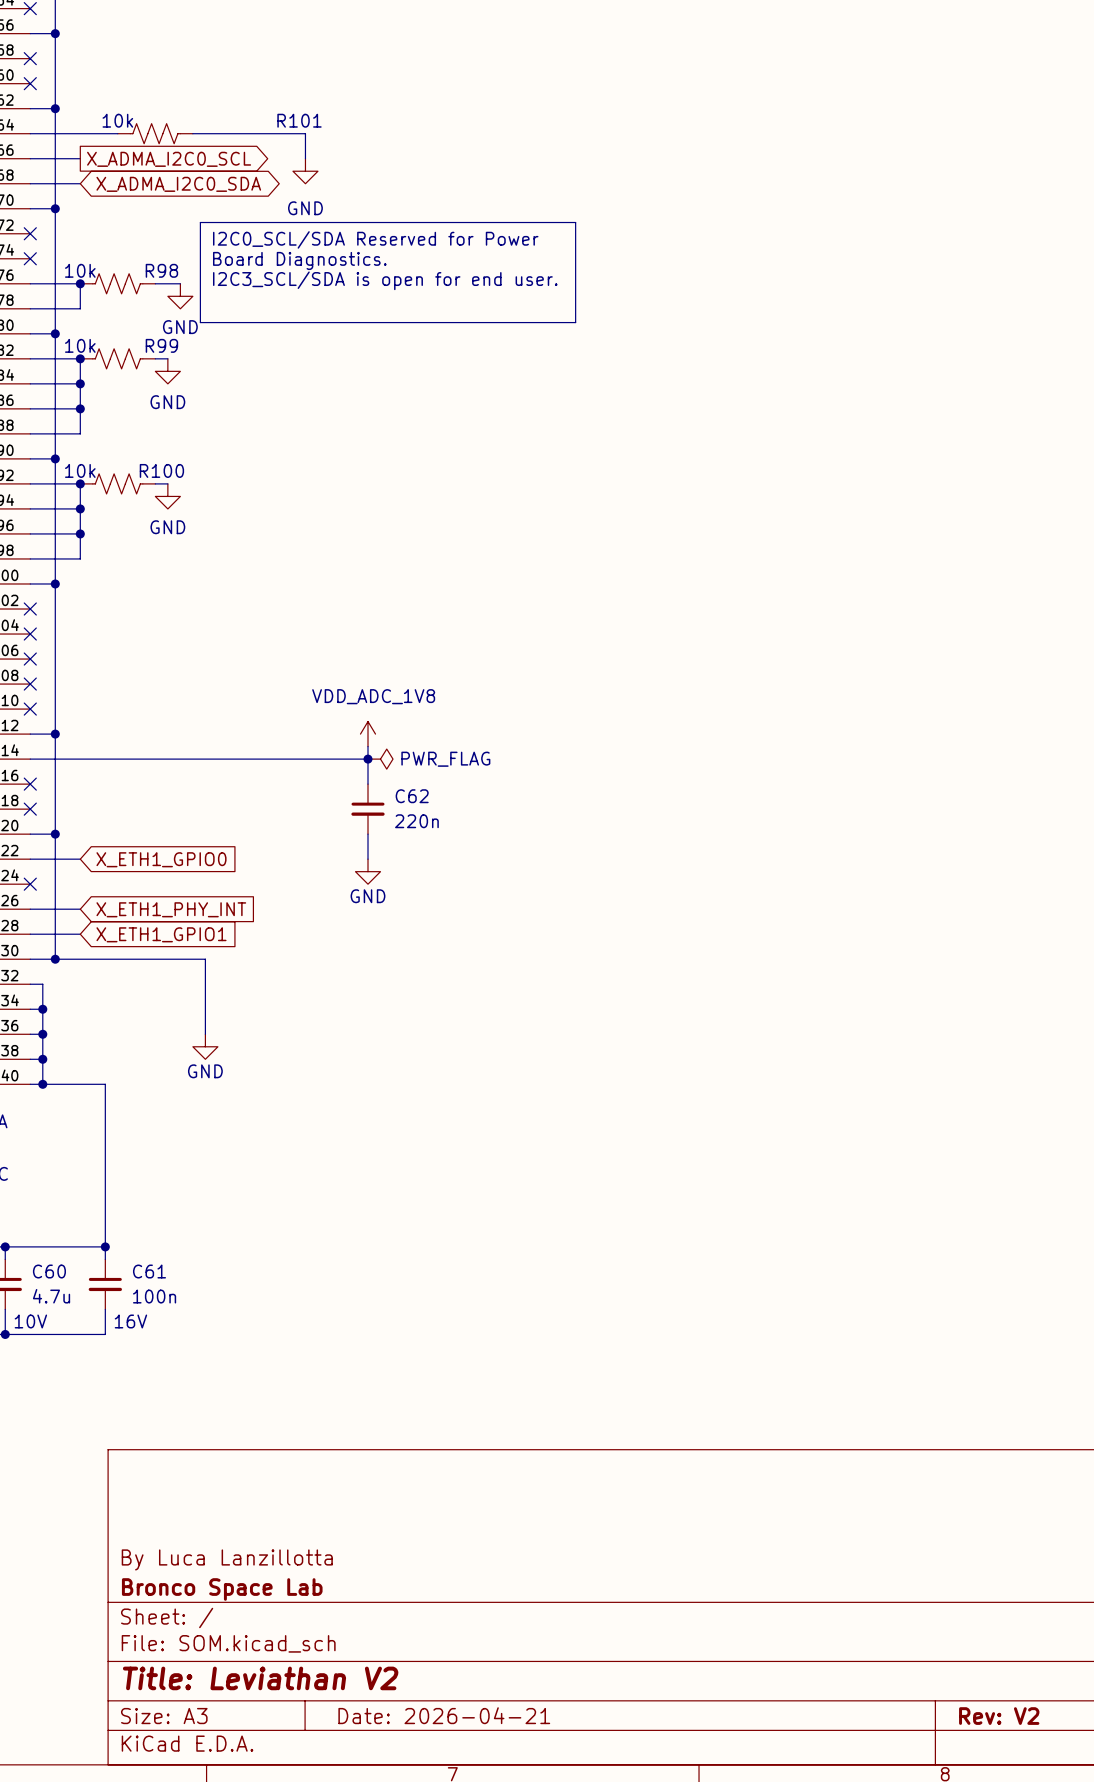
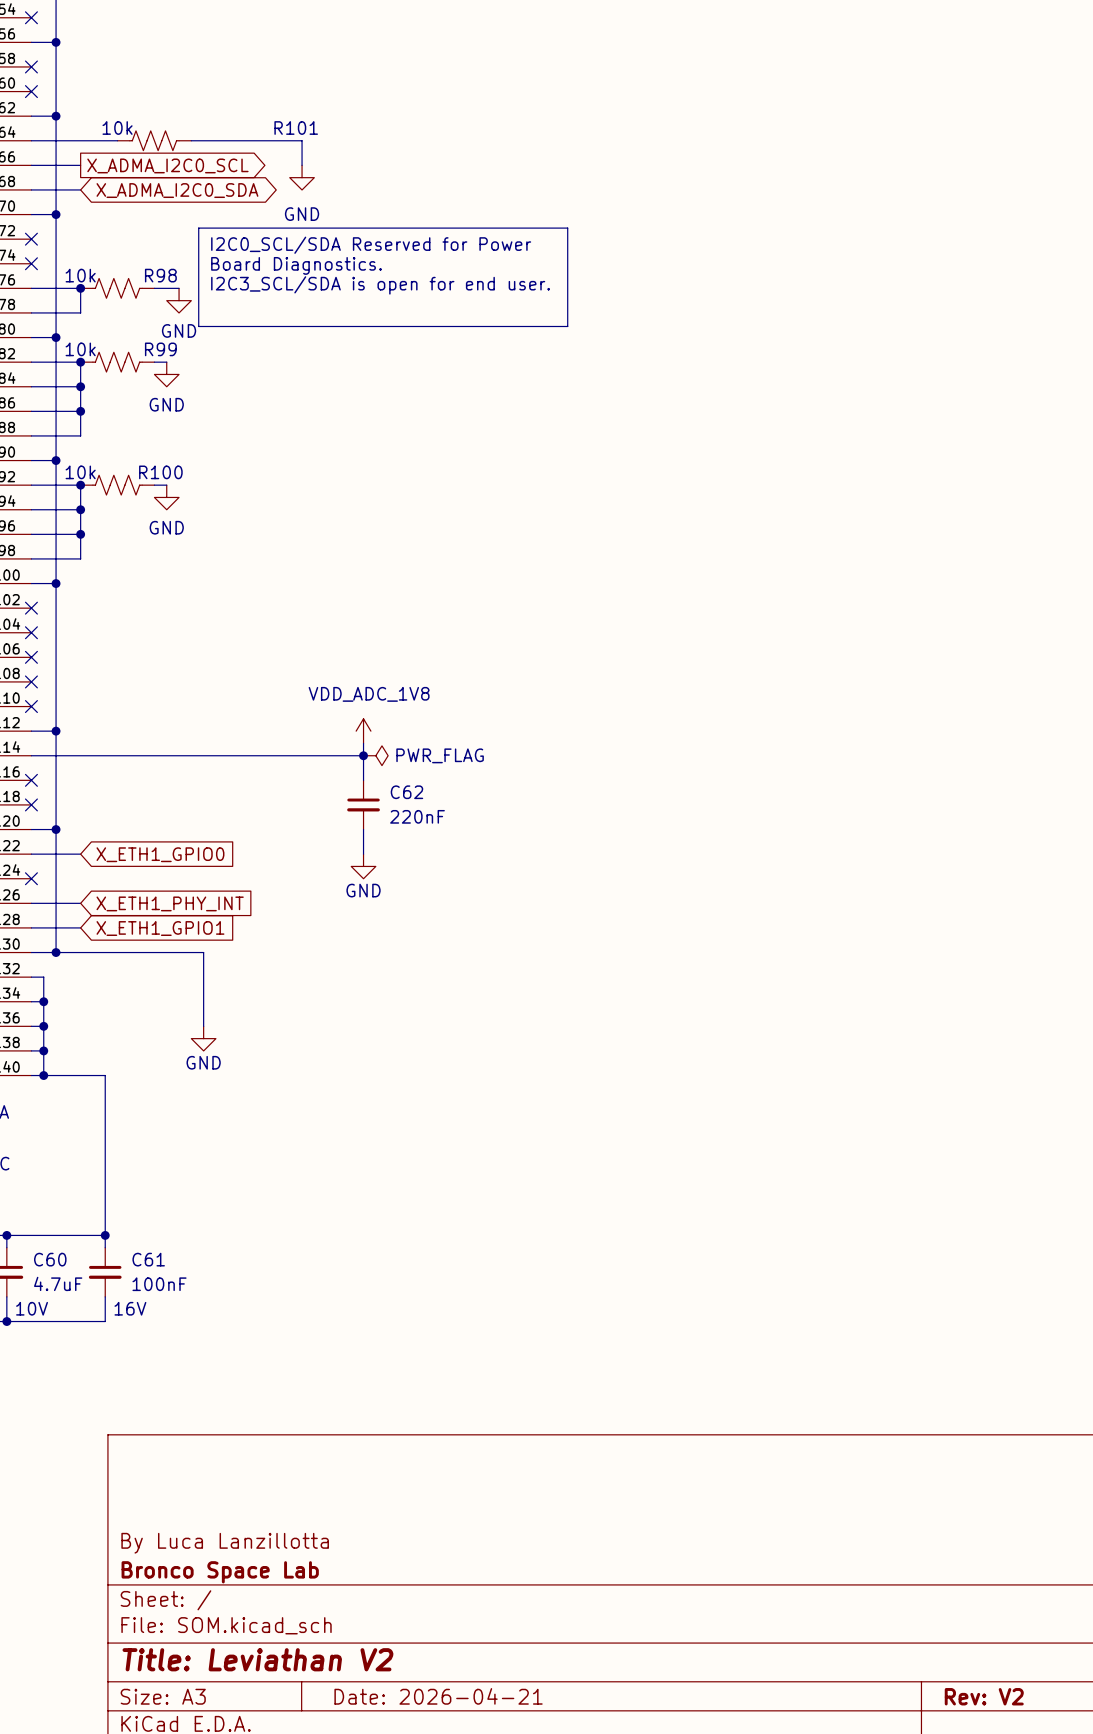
C62 value: 220n (416, 821) -> 220nF (417, 816)
C60 value: 4.7u (51, 1296) -> 4.7uF (58, 1283)
C61 value: 100n (154, 1296) -> 100nF (159, 1284)

